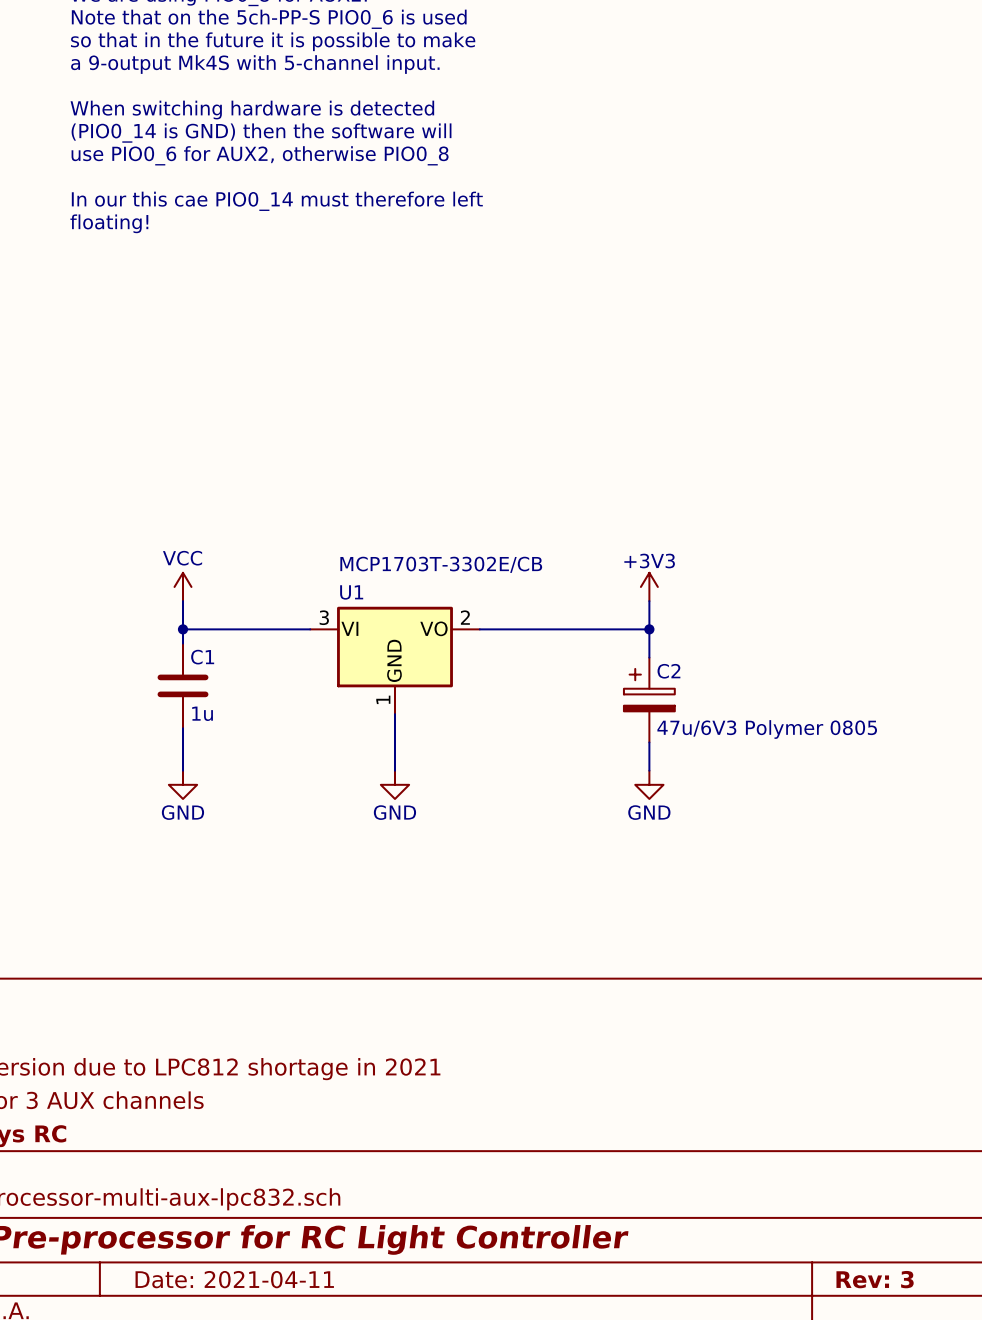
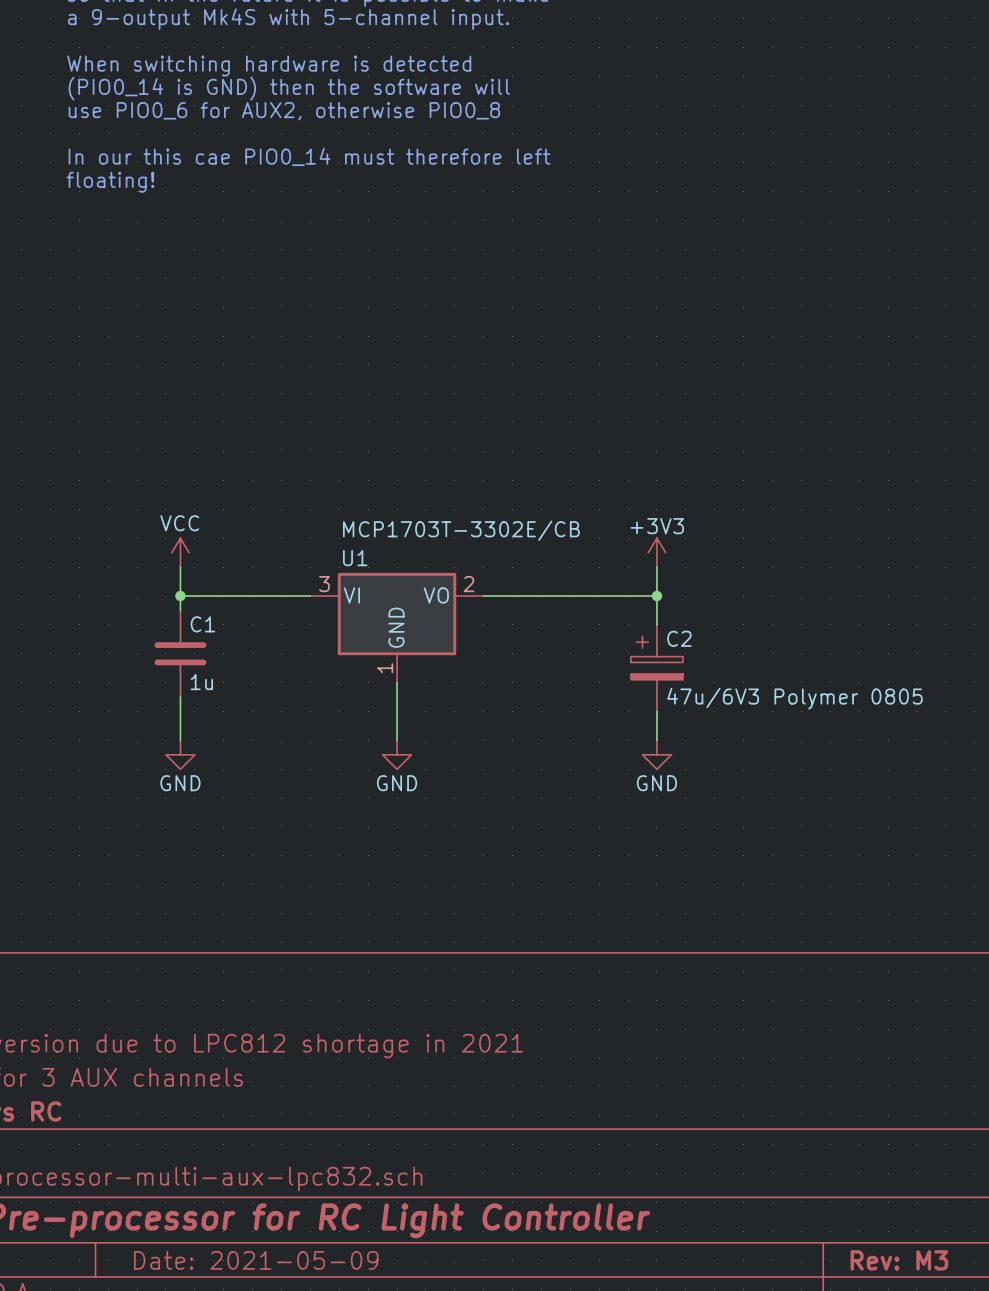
title block: Date: 2021-04-11 (234, 1279) -> Date: 2021-05-09 (256, 1260)
title block: Rev: 3 (875, 1279) -> Rev: M3 (899, 1260)

